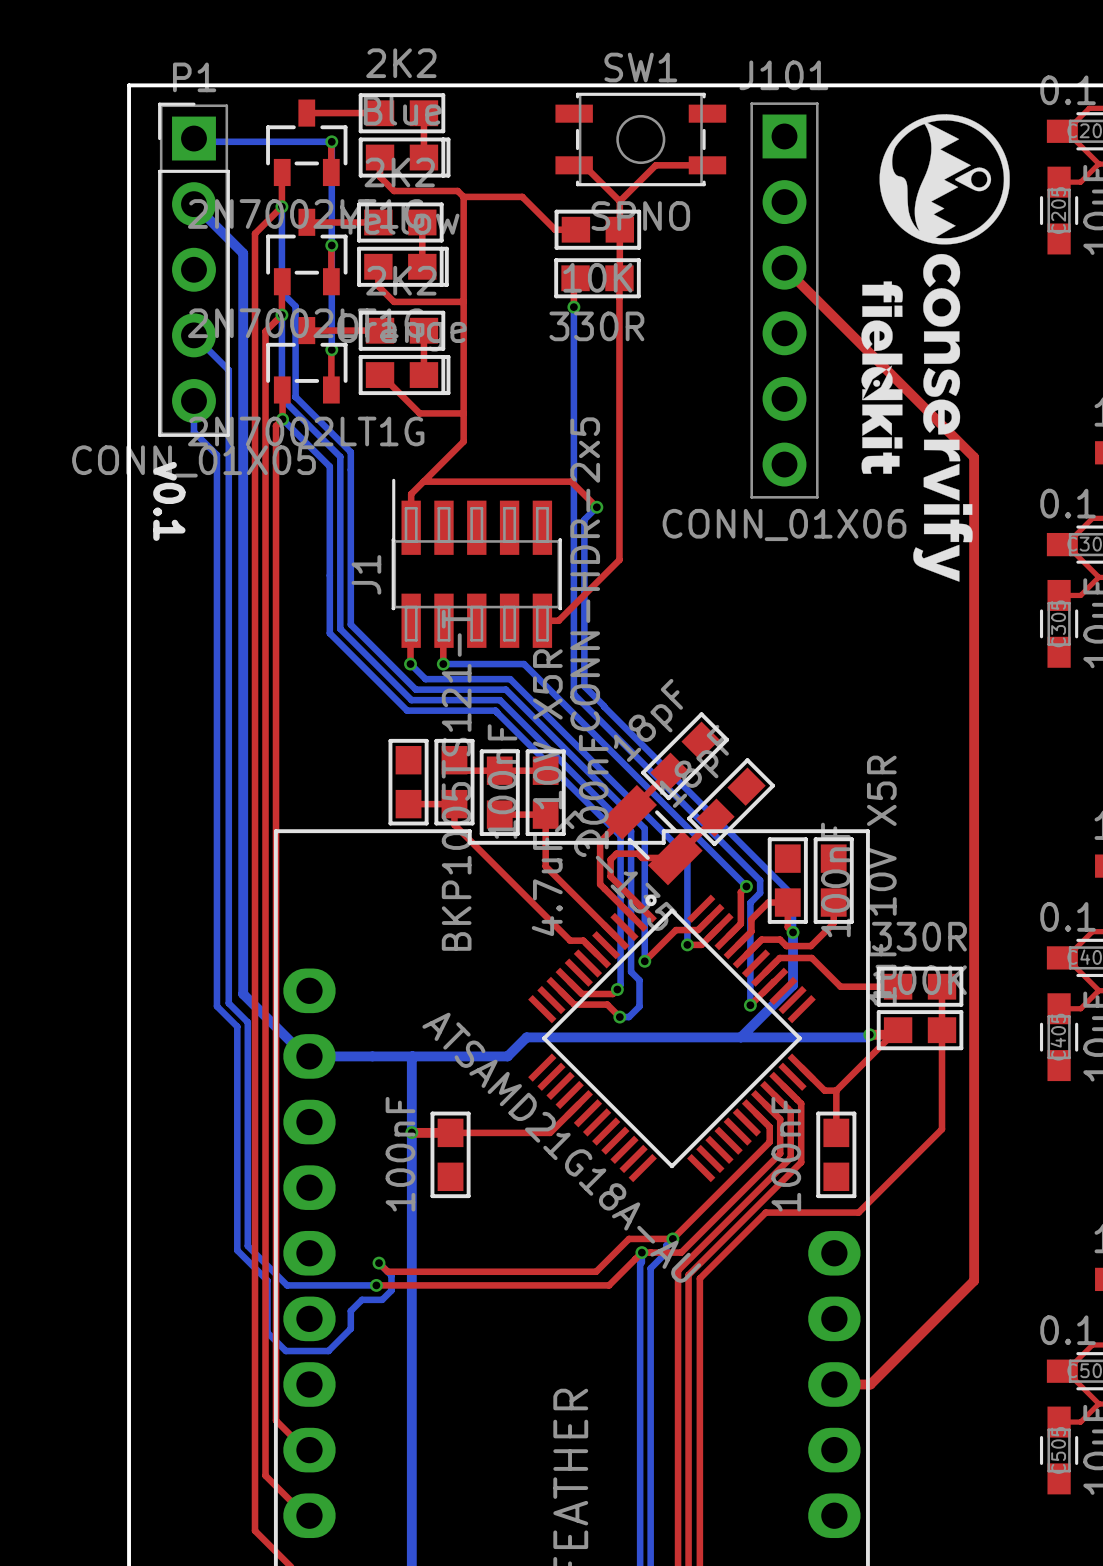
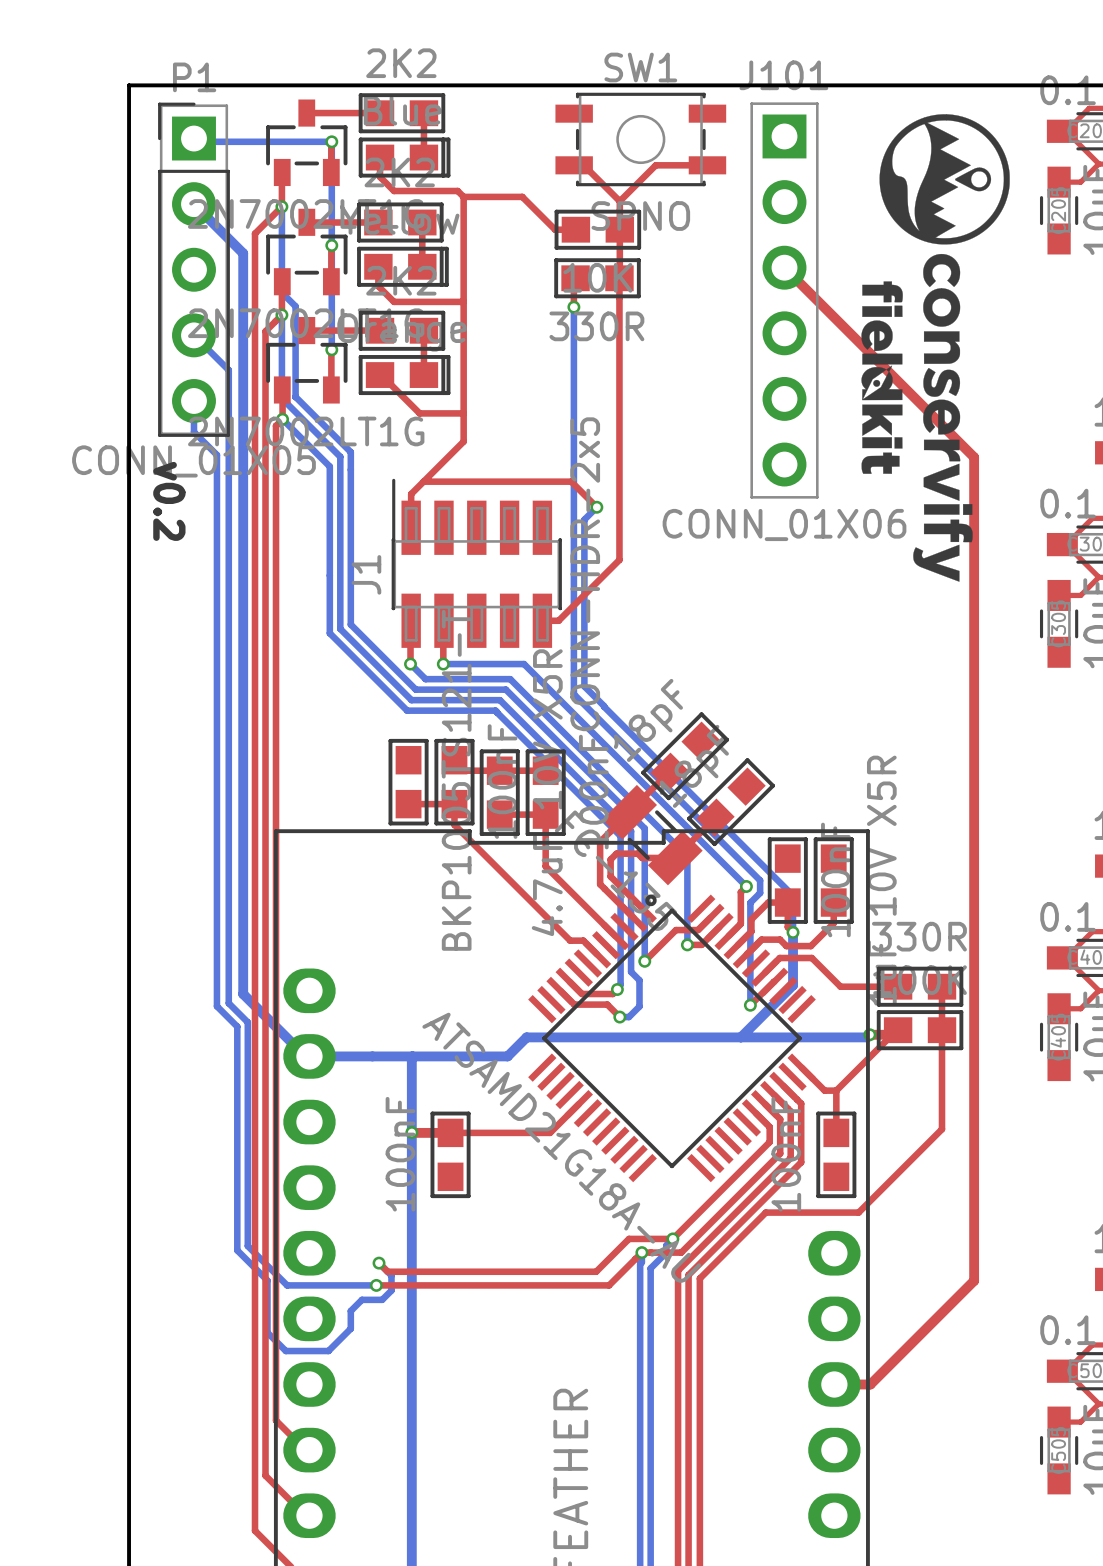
text: v0.1 (169, 501) -> v0.2 (169, 501)

